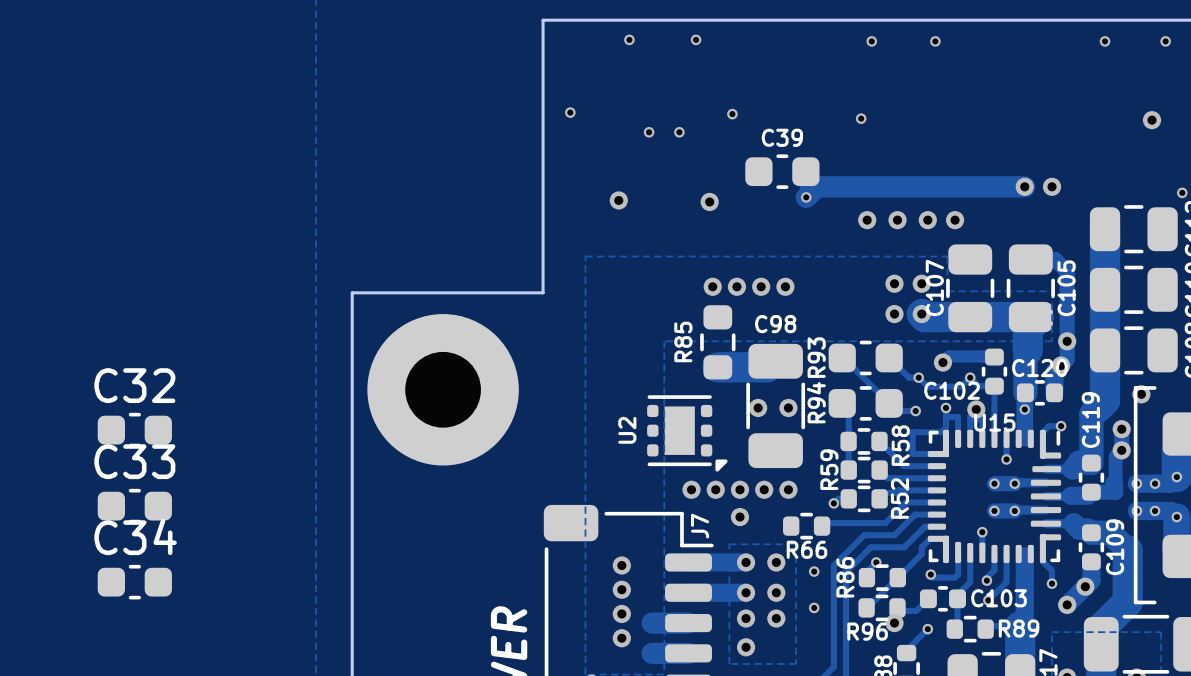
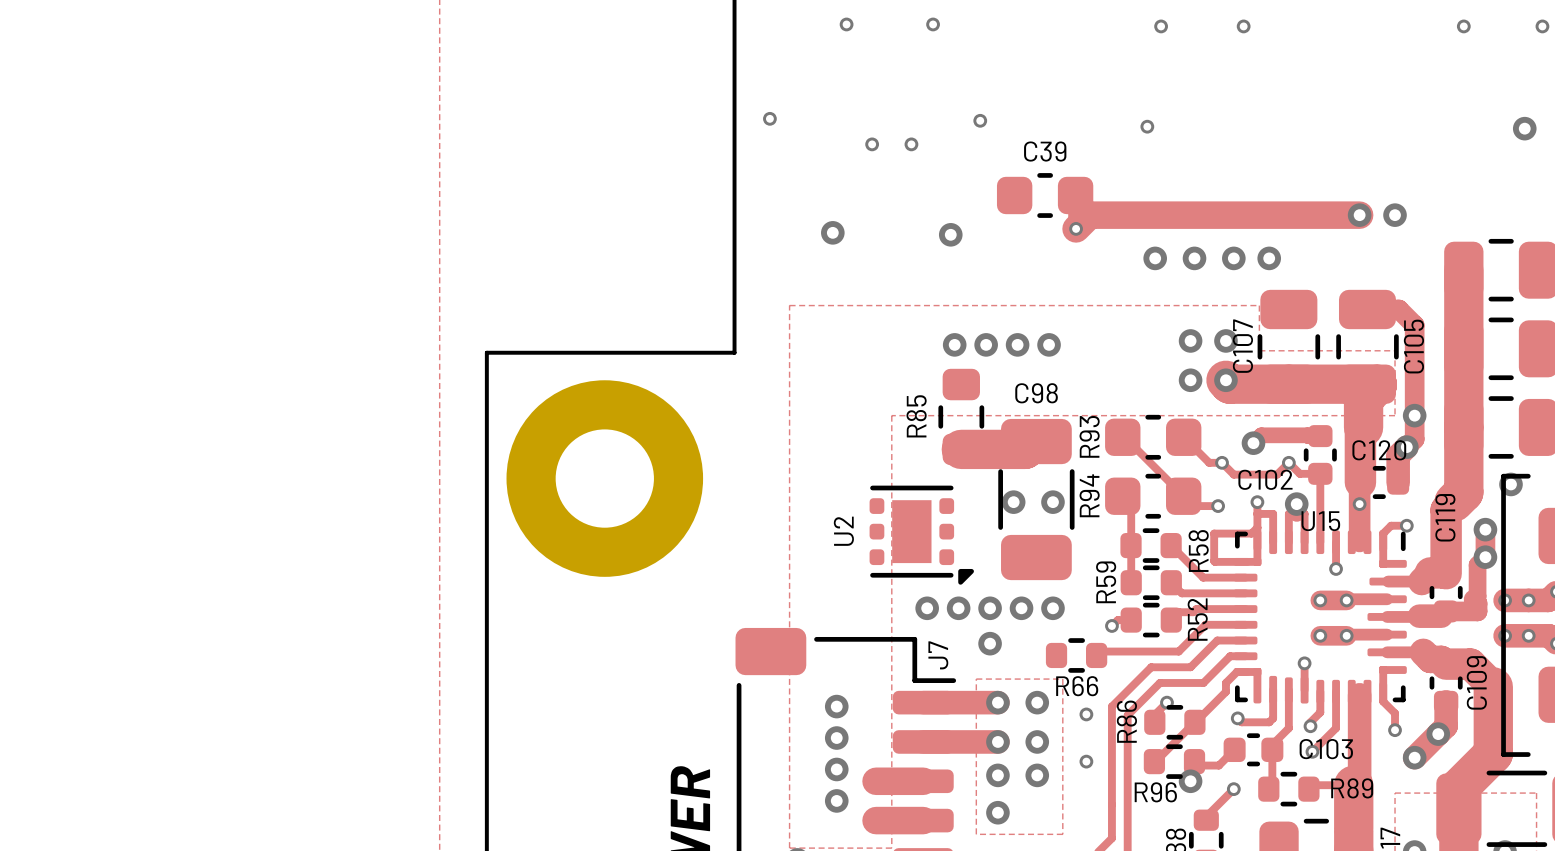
C32: (134, 430) -> none
C33: (134, 506) -> none
C34: (134, 582) -> none

